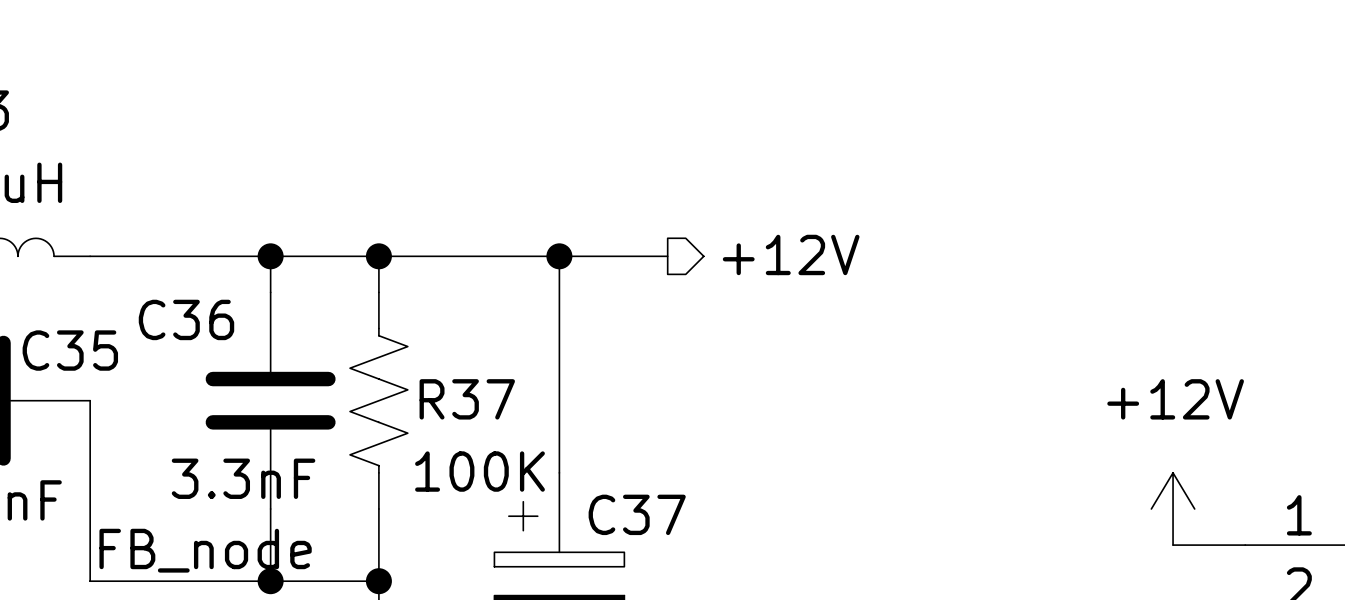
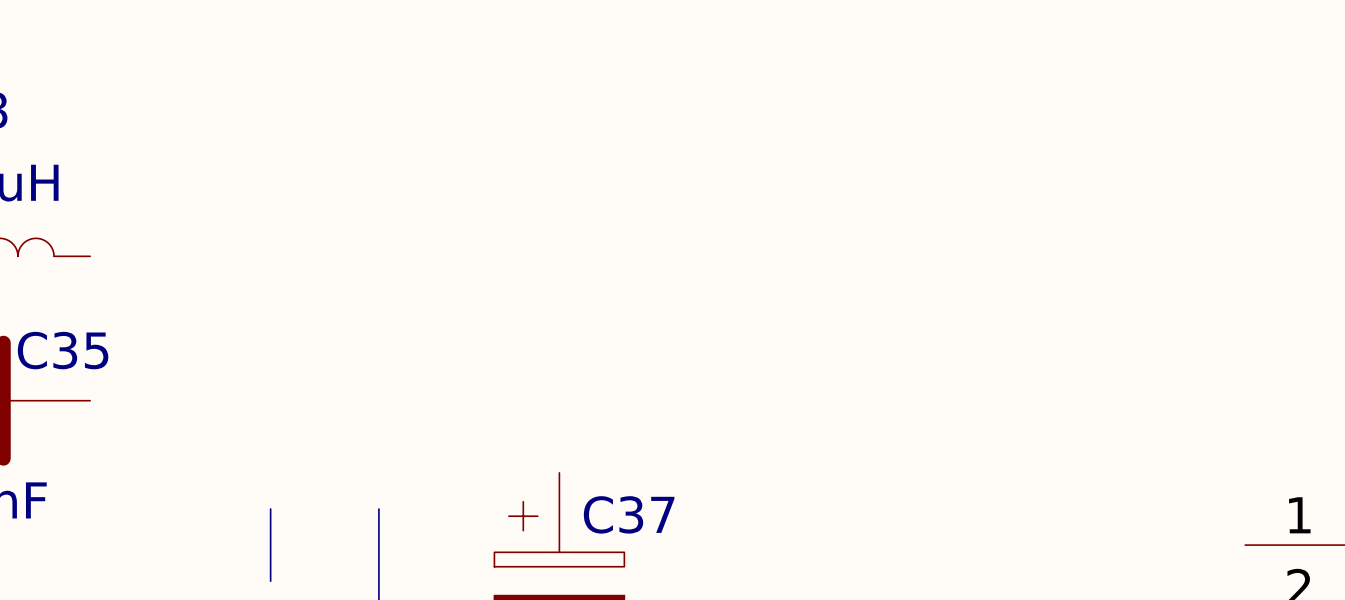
hierarchical label: +12V (791, 254) -> none
wire: (90, 256) (667, 256) -> none
wire: (270, 256) (270, 292) -> none
junction: (270, 256) -> none
wire: (378, 256) (378, 292) -> none
junction: (378, 256) -> none
wire: (559, 256) (559, 472) -> none
junction: (559, 256) -> none
wire: (90, 400) (90, 581) (378, 581) -> none
C36: 3.3nF (270, 400) -> none
R37: 100K (378, 400) -> none
power symbol: +12V (1173, 508) -> none
wire: (1173, 545) (1245, 545) -> none
label: FB_node (205, 550) -> none
junction: (270, 581) -> none
junction: (378, 581) -> none

